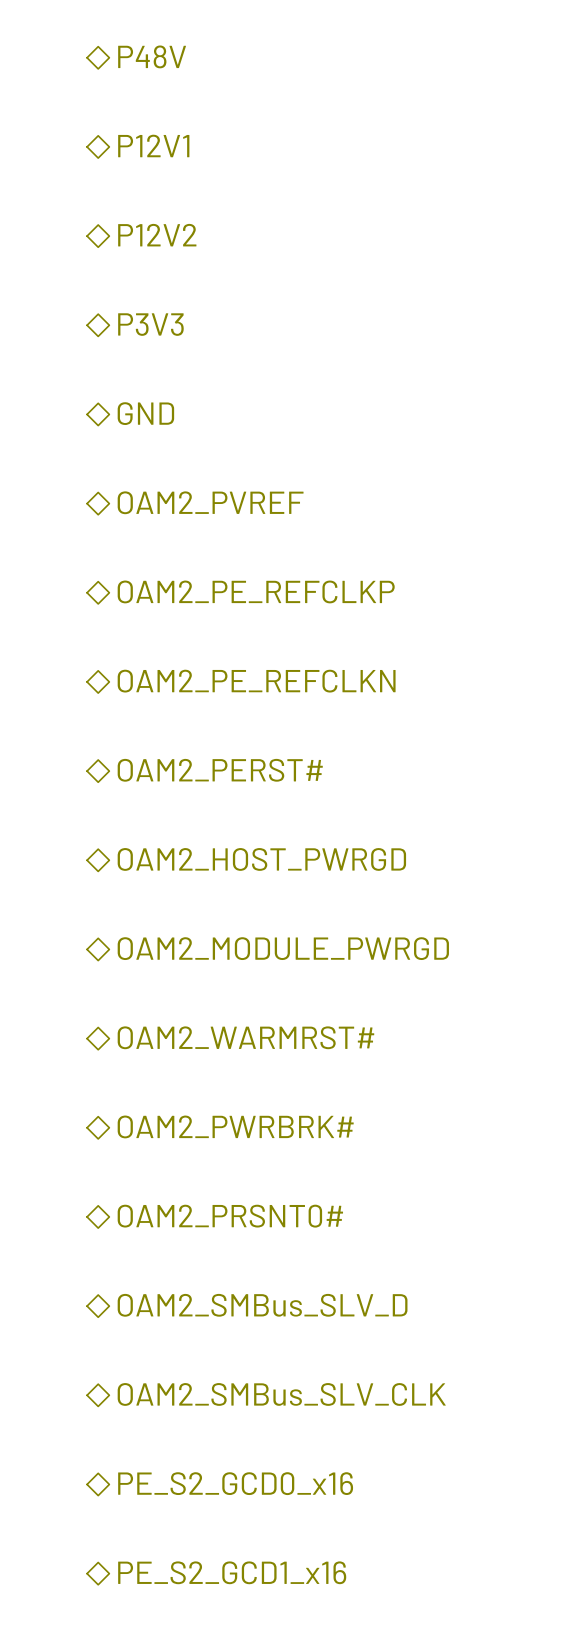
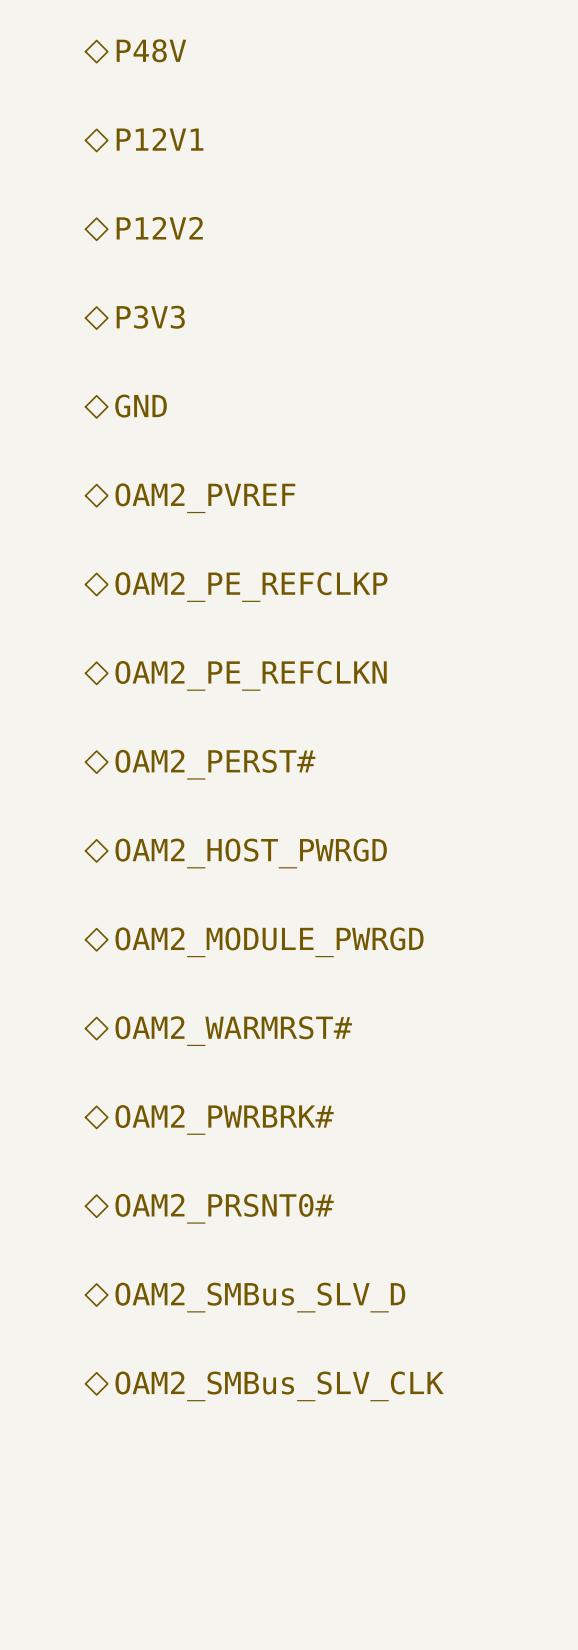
hierarchical label: PE_S2_GCD0_x16 (235, 1483) -> none
hierarchical label: PE_S2_GCD1_x16 (232, 1572) -> none

